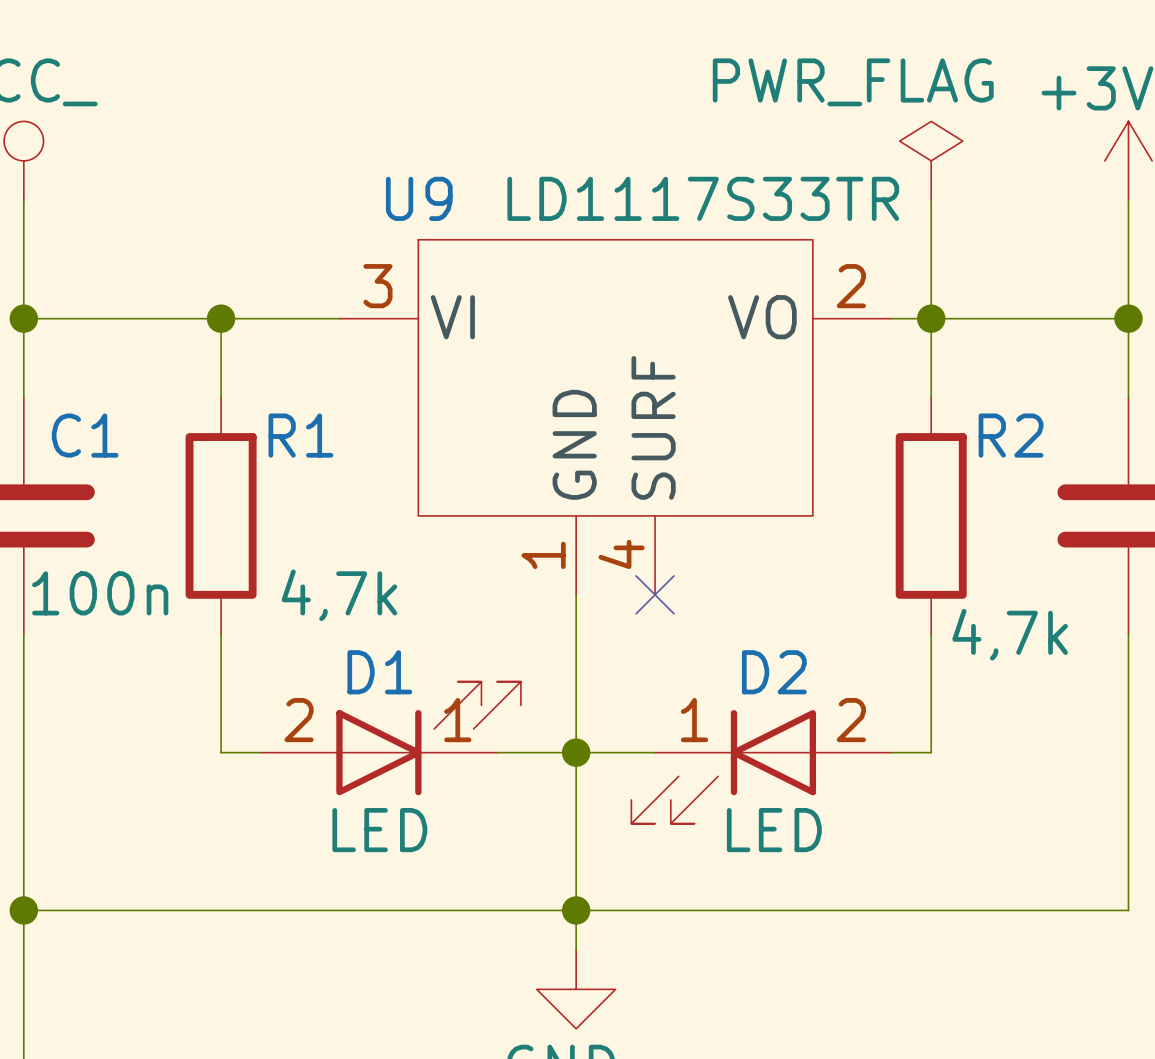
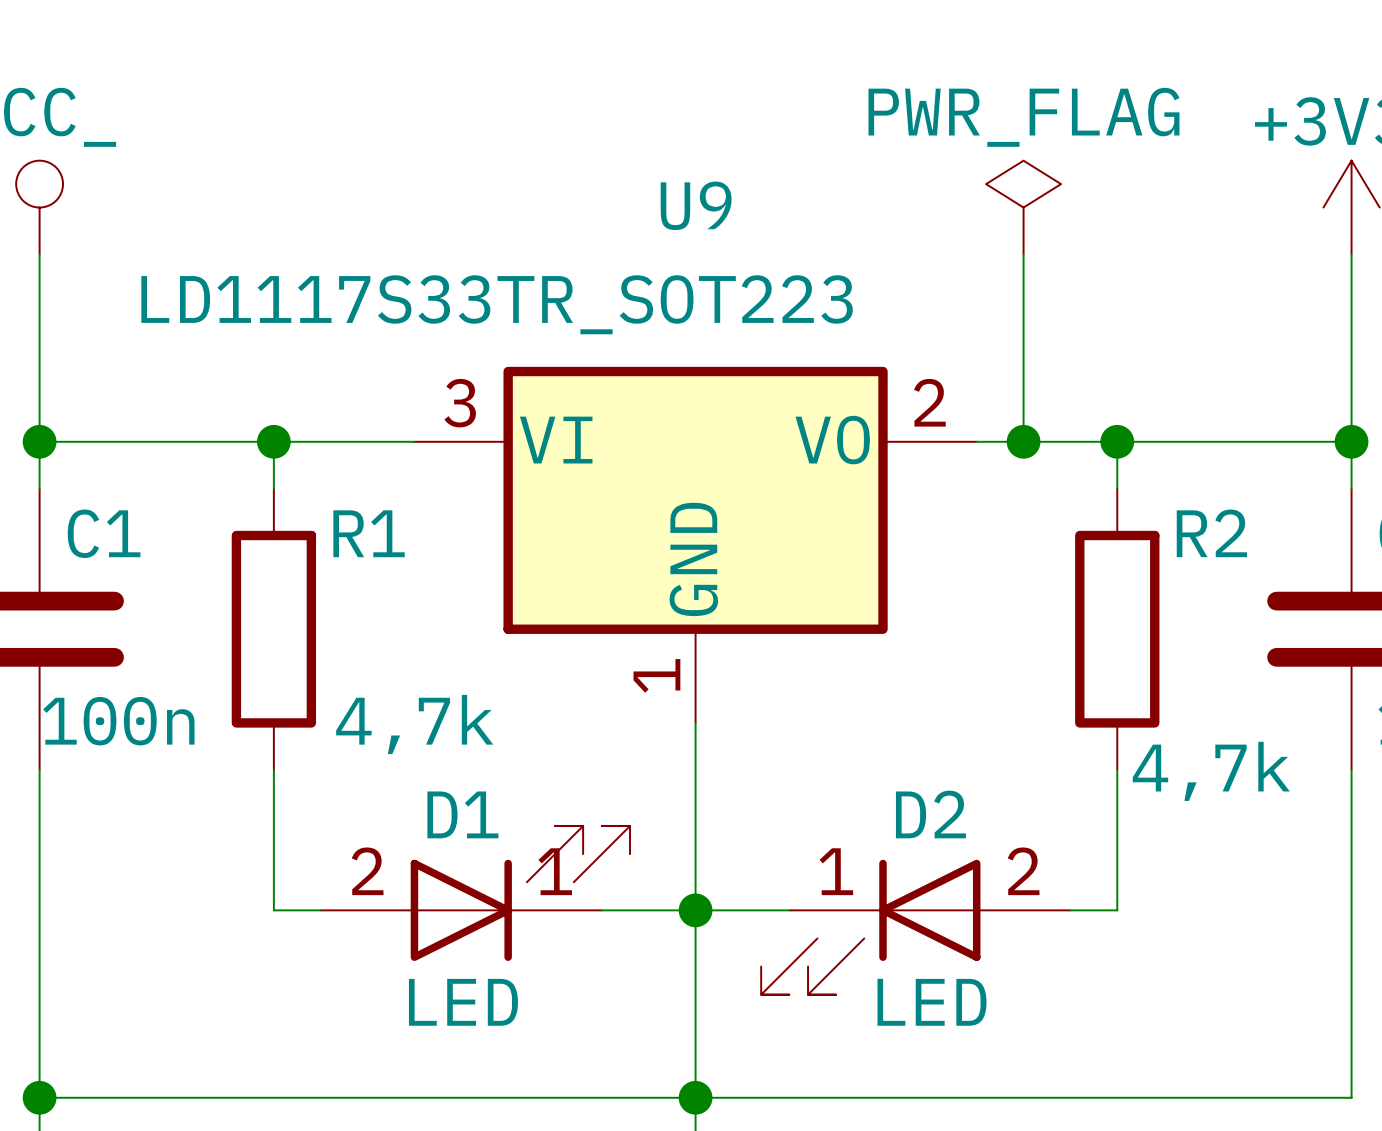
power symbol position: PWR_FLAG (931, 160) -> PWR_FLAG (1023, 207)
U9 name position: U9 (419, 198) -> U9 (696, 205)
U9 value: LD1117S33TR (703, 198) -> LD1117S33TR_SOT223 (497, 304)
wire: (931, 200) (931, 358) -> (1023, 254) (1023, 441)
U9 symbol: [339, 239, 892, 595] -> [414, 366, 977, 723]
wire: (23, 318) (339, 318) -> (39, 441) (414, 441)
junction position: (23, 318) -> (39, 441)
wire: (221, 318) (221, 358) -> none
junction position: (221, 318) -> (273, 441)
wire: (891, 318) (1128, 318) -> none
junction position: (931, 318) -> (1117, 441)
junction position: (1128, 318) -> (1351, 441)
wire: none -> (976, 441) (1351, 441)
junction: none -> (1023, 441)
no-connect mark: (655, 594) -> none

